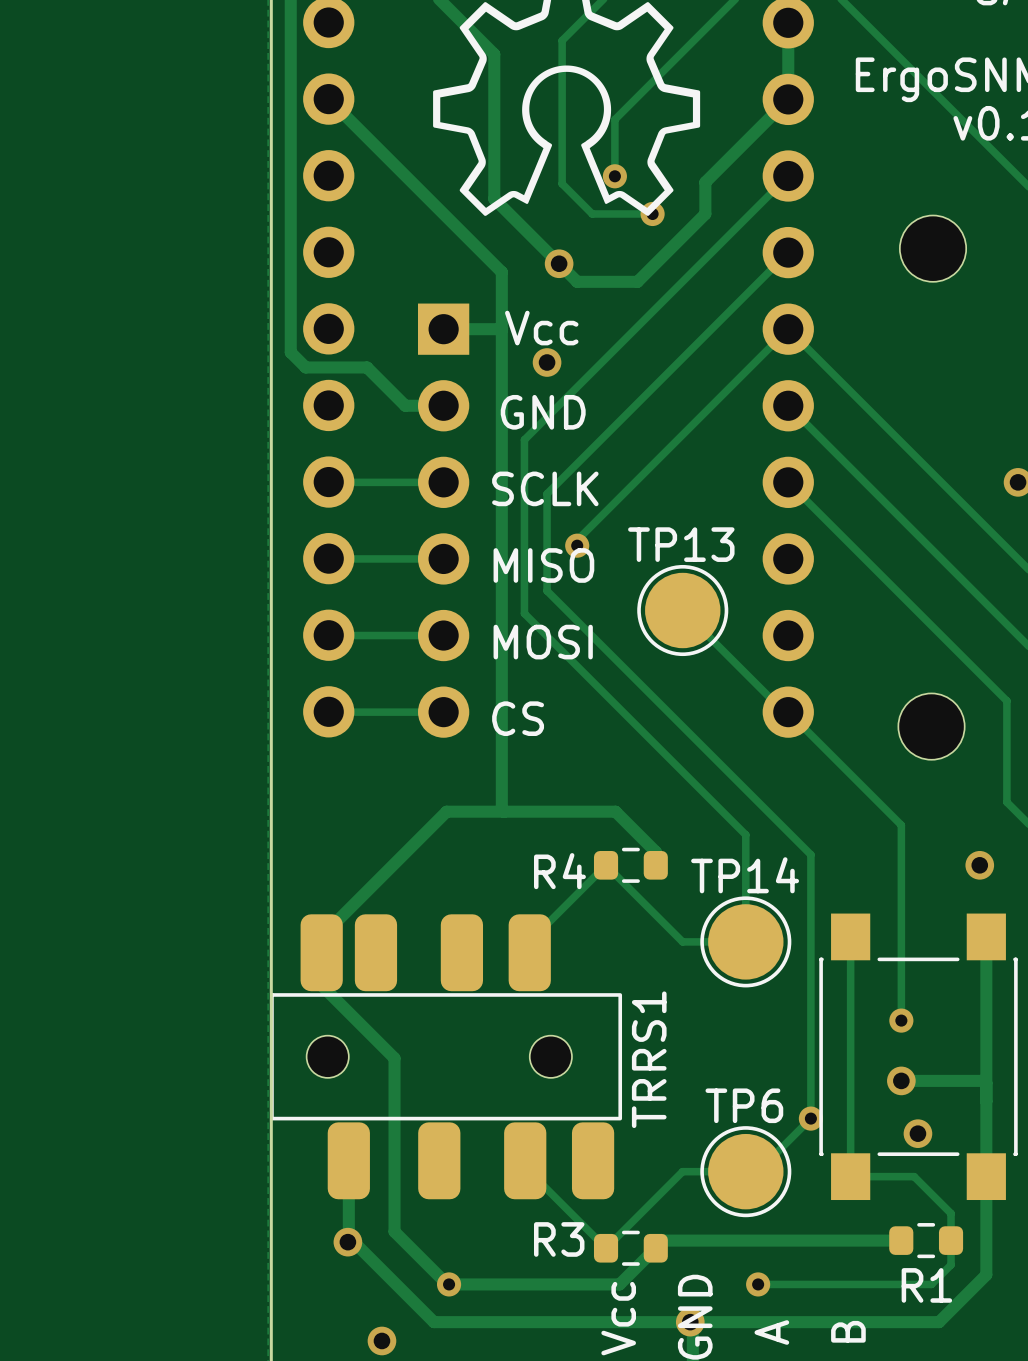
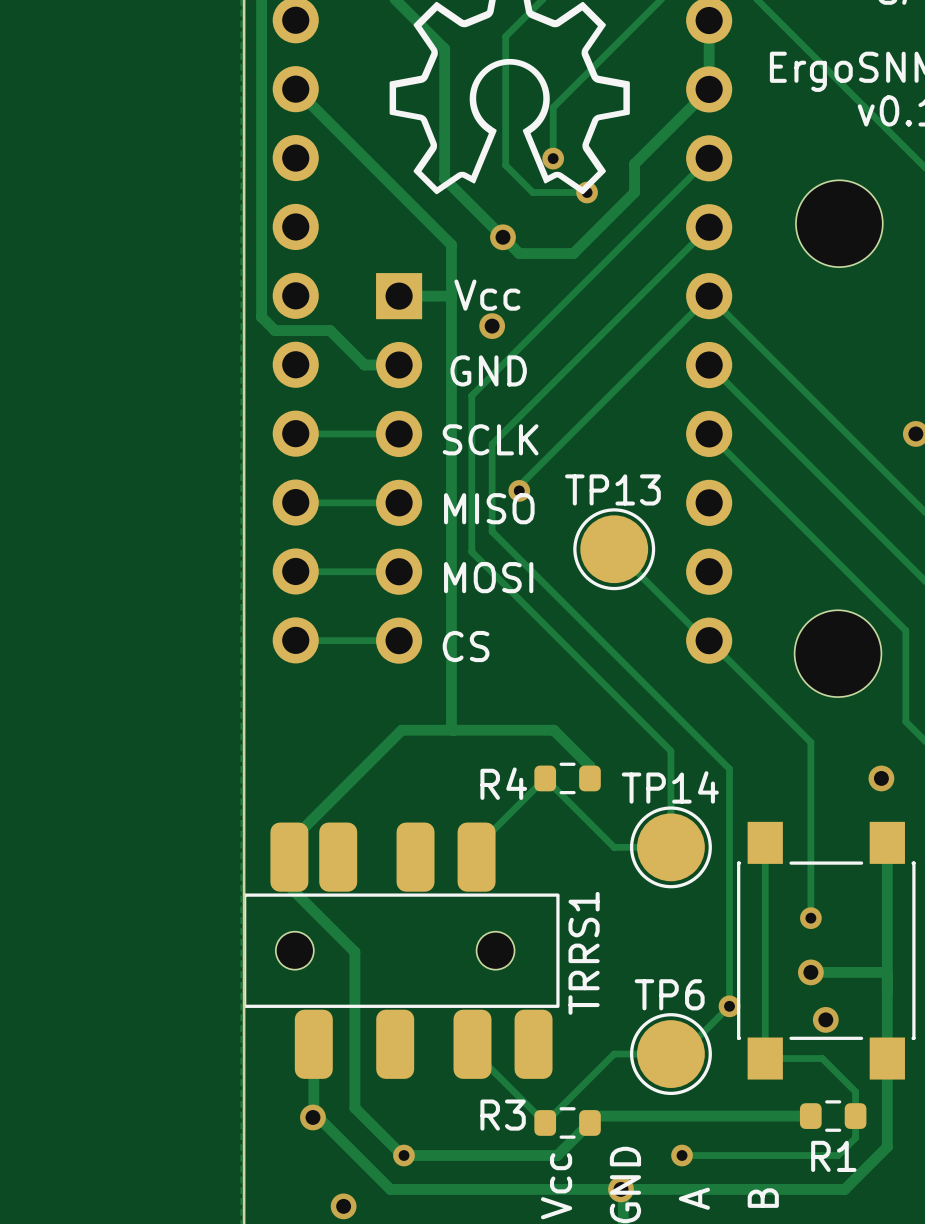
part footprint: [899, 215, 967, 282] -> [795, 180, 883, 268]
part footprint: [898, 693, 965, 760] -> [794, 610, 882, 698]

